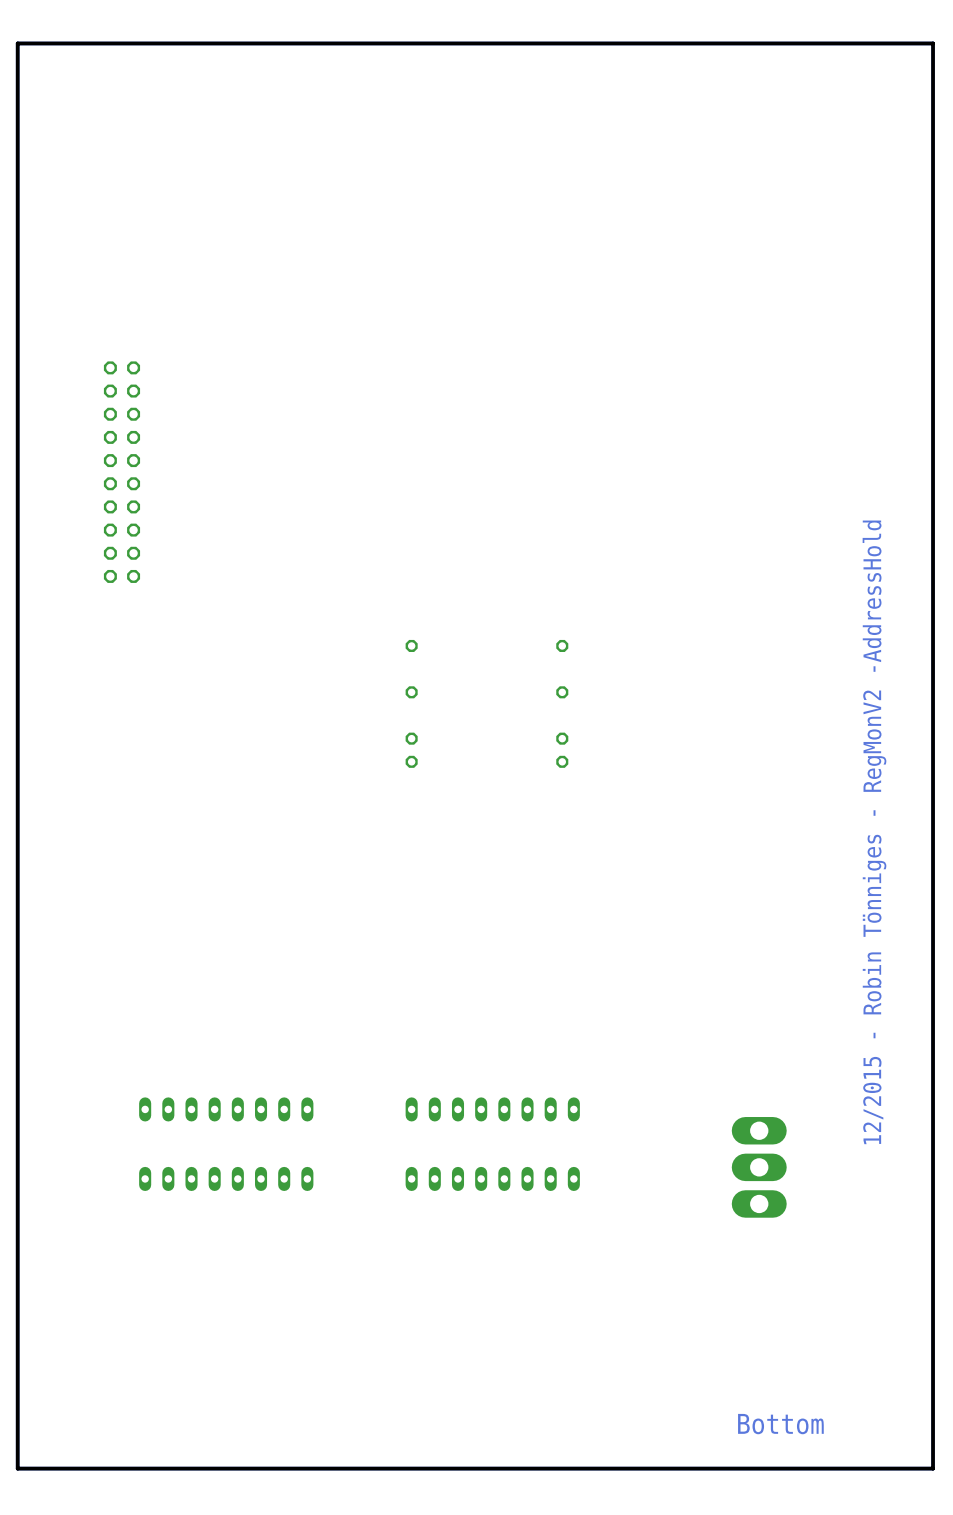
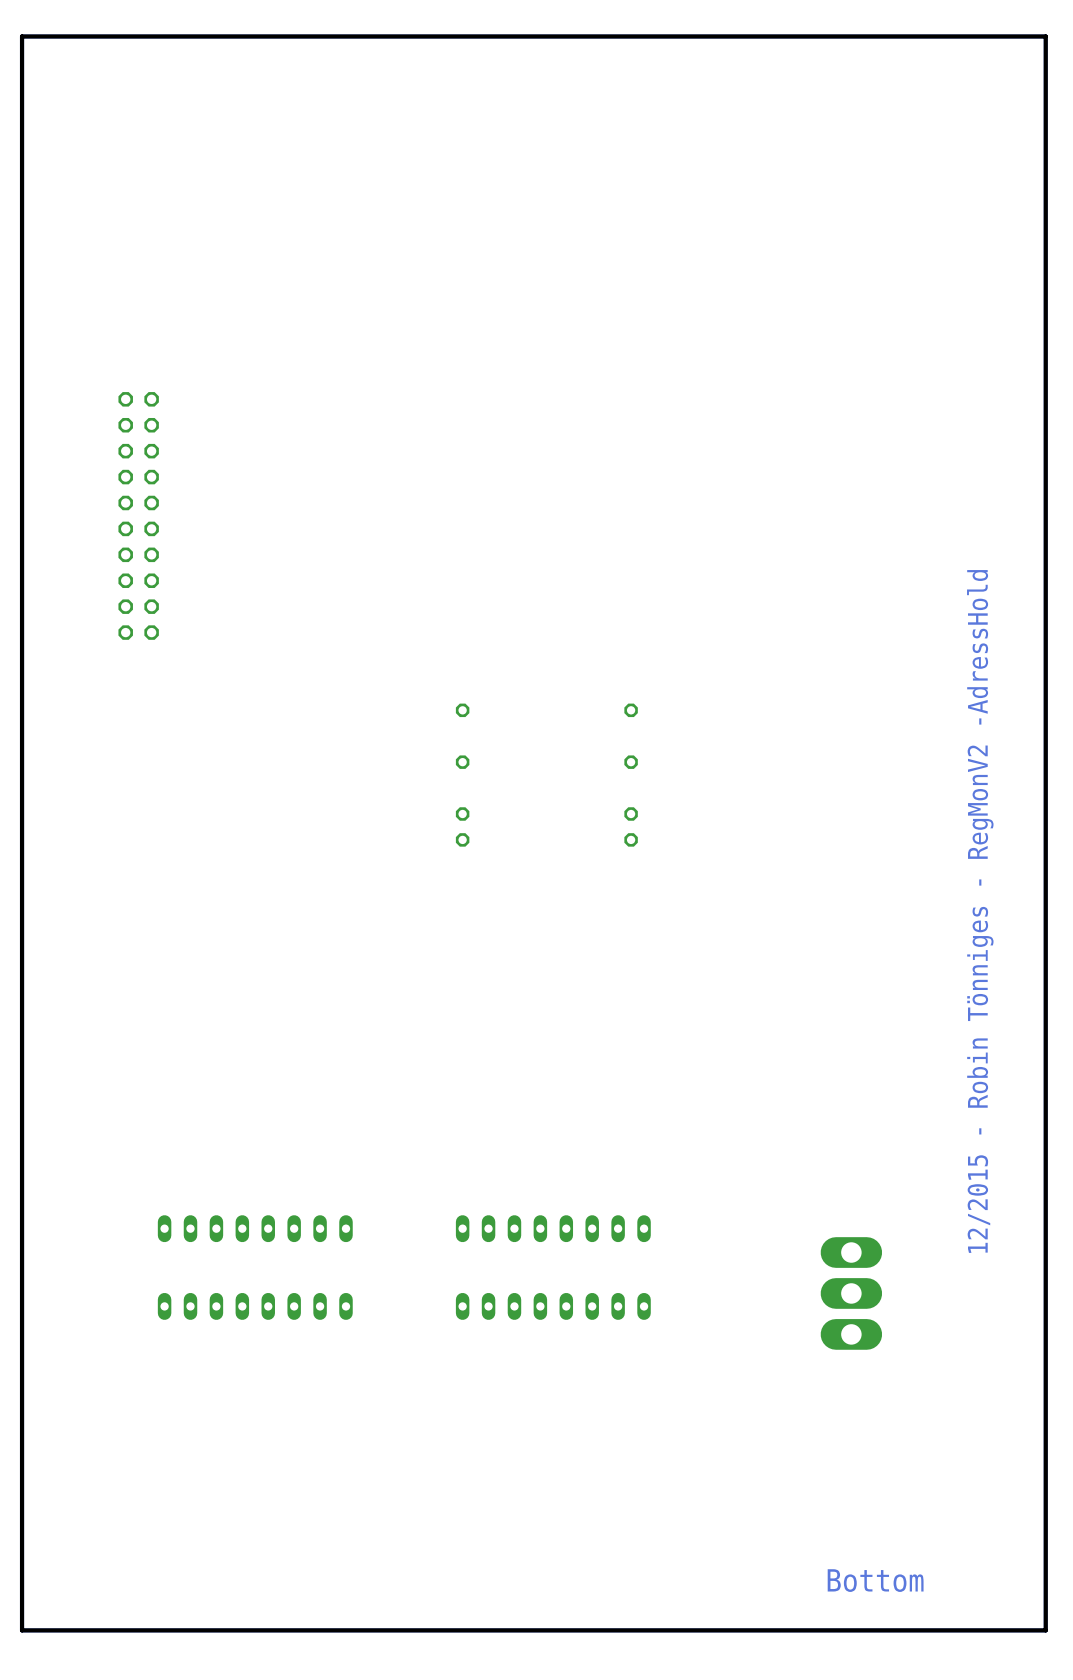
text: 12/2015 - Robin Tönniges - RegMonV2 -AddressHold (874, 832) -> 12/2015 - Robin Tönniges - RegMonV2 -AdressHold (980, 911)

